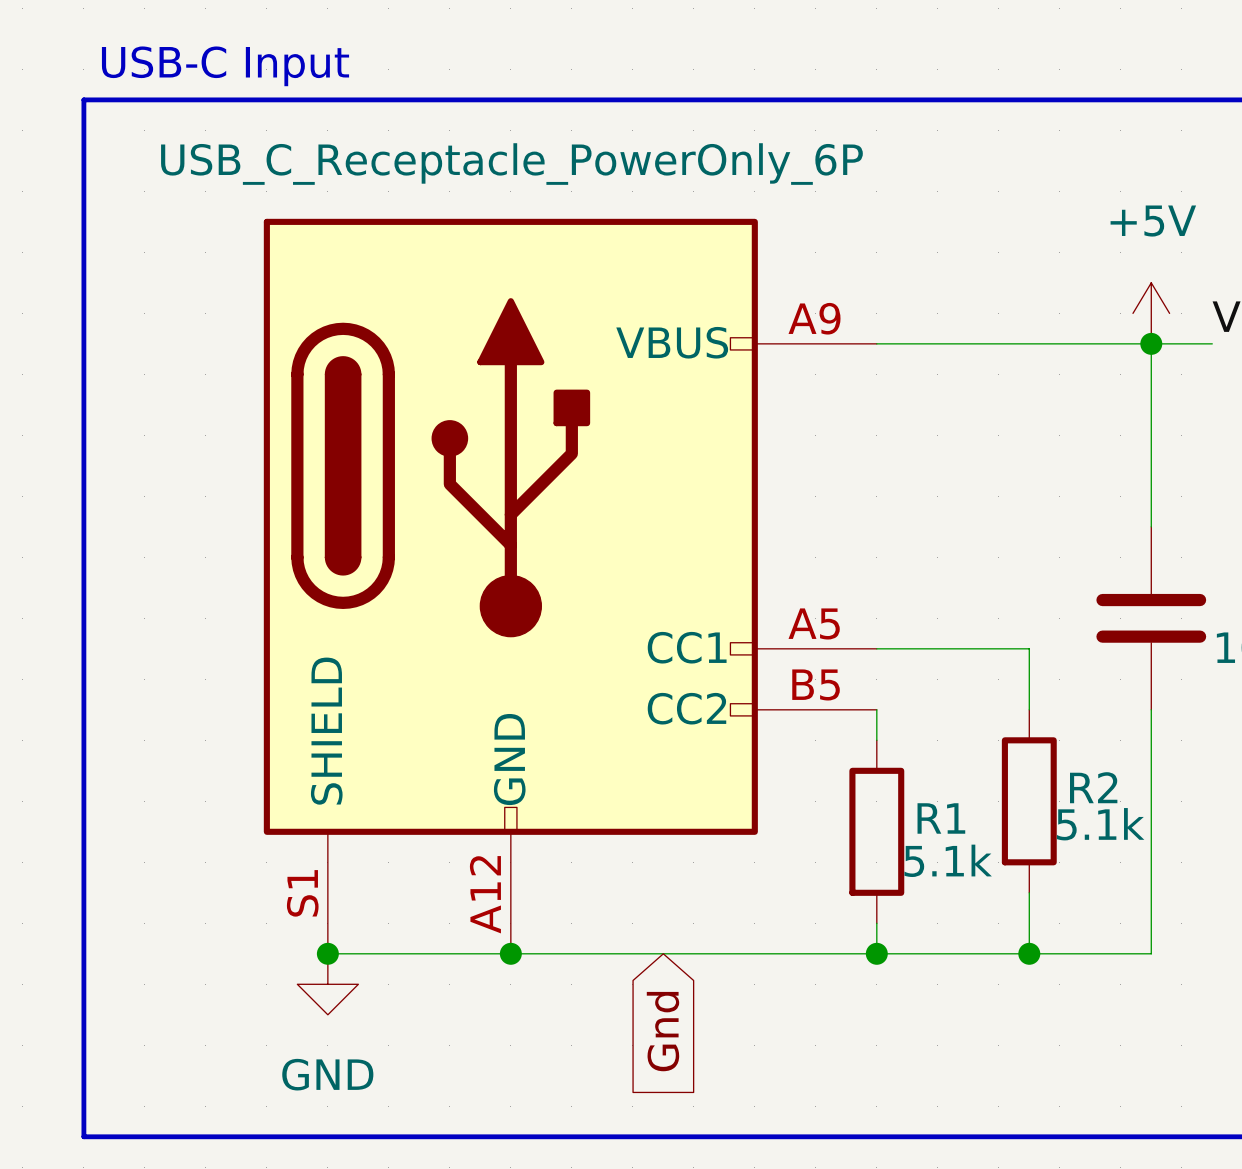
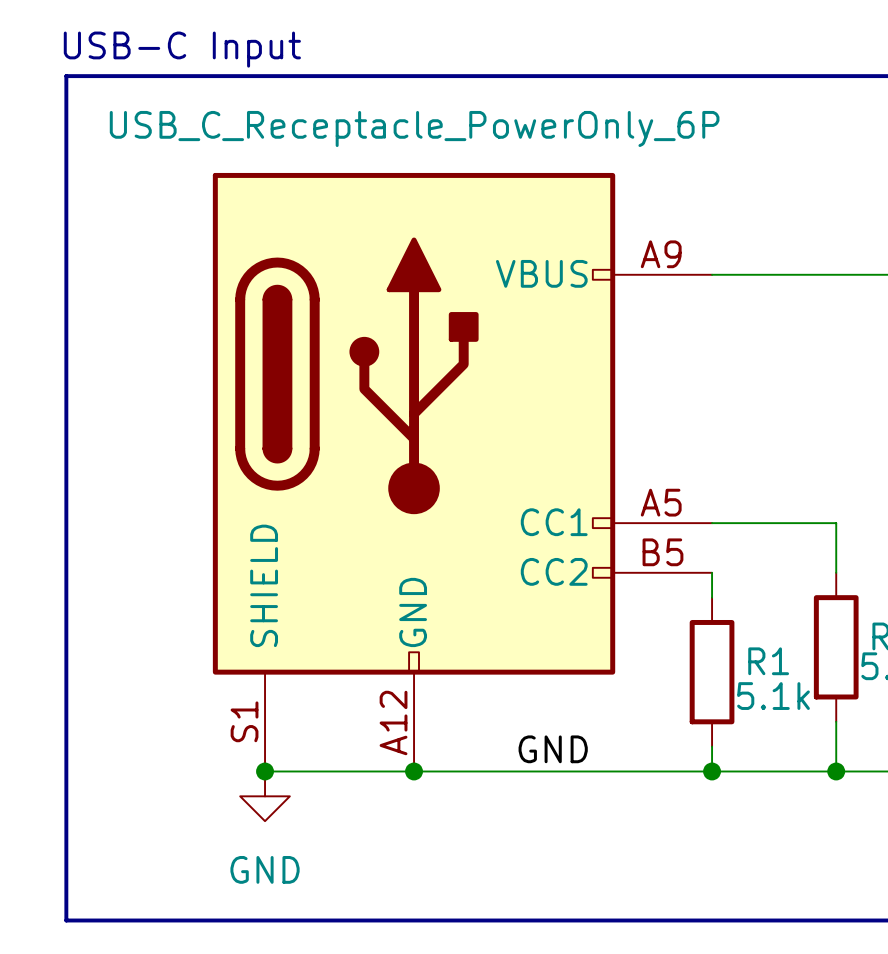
label: none -> GND (553, 749)
global label: Gnd (662, 1031) -> none

